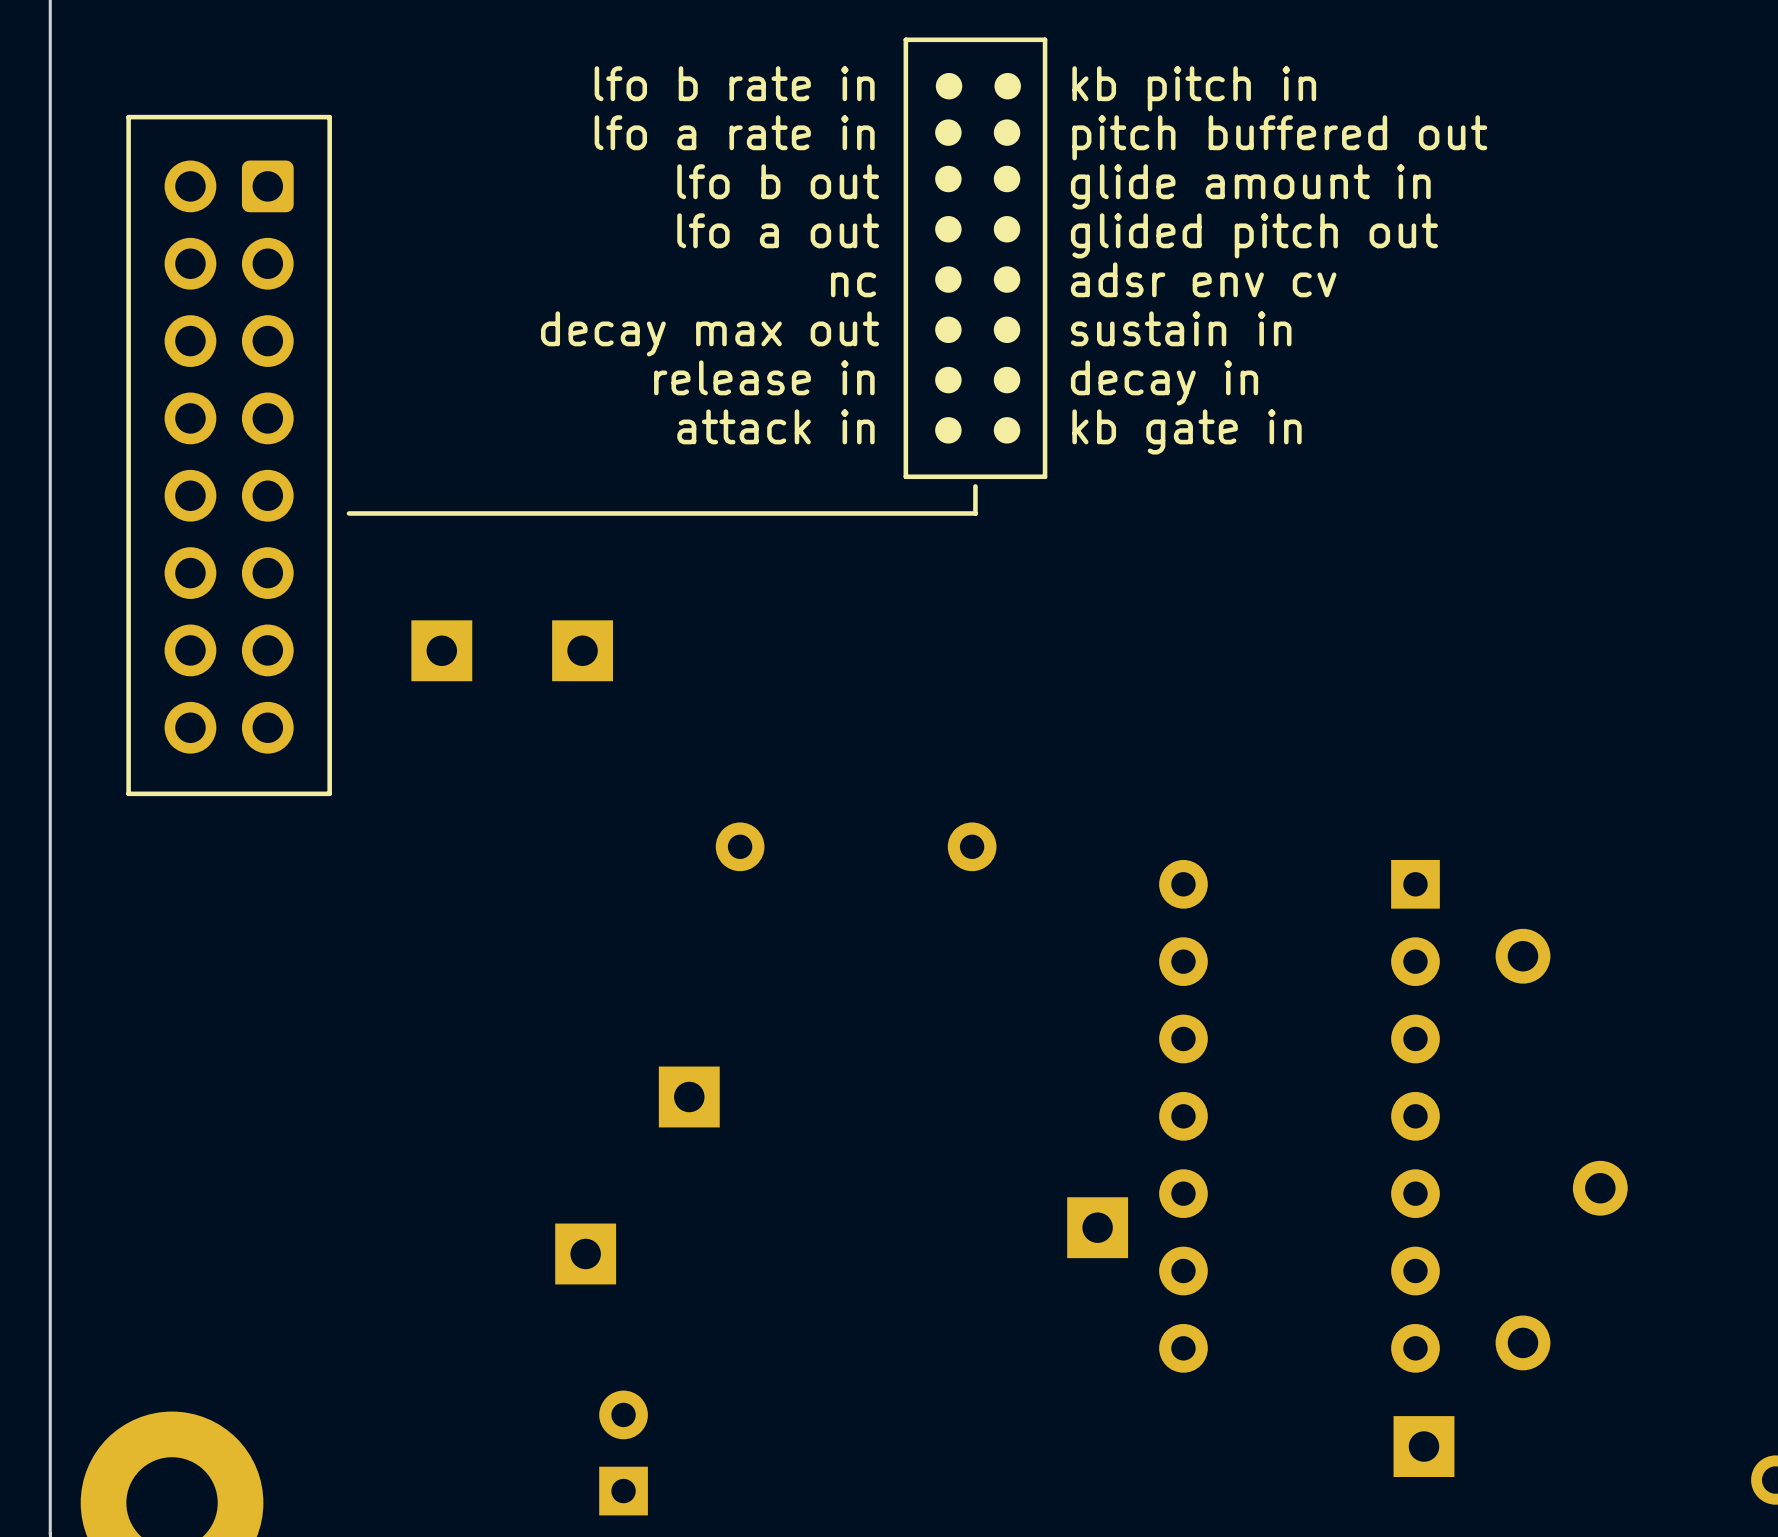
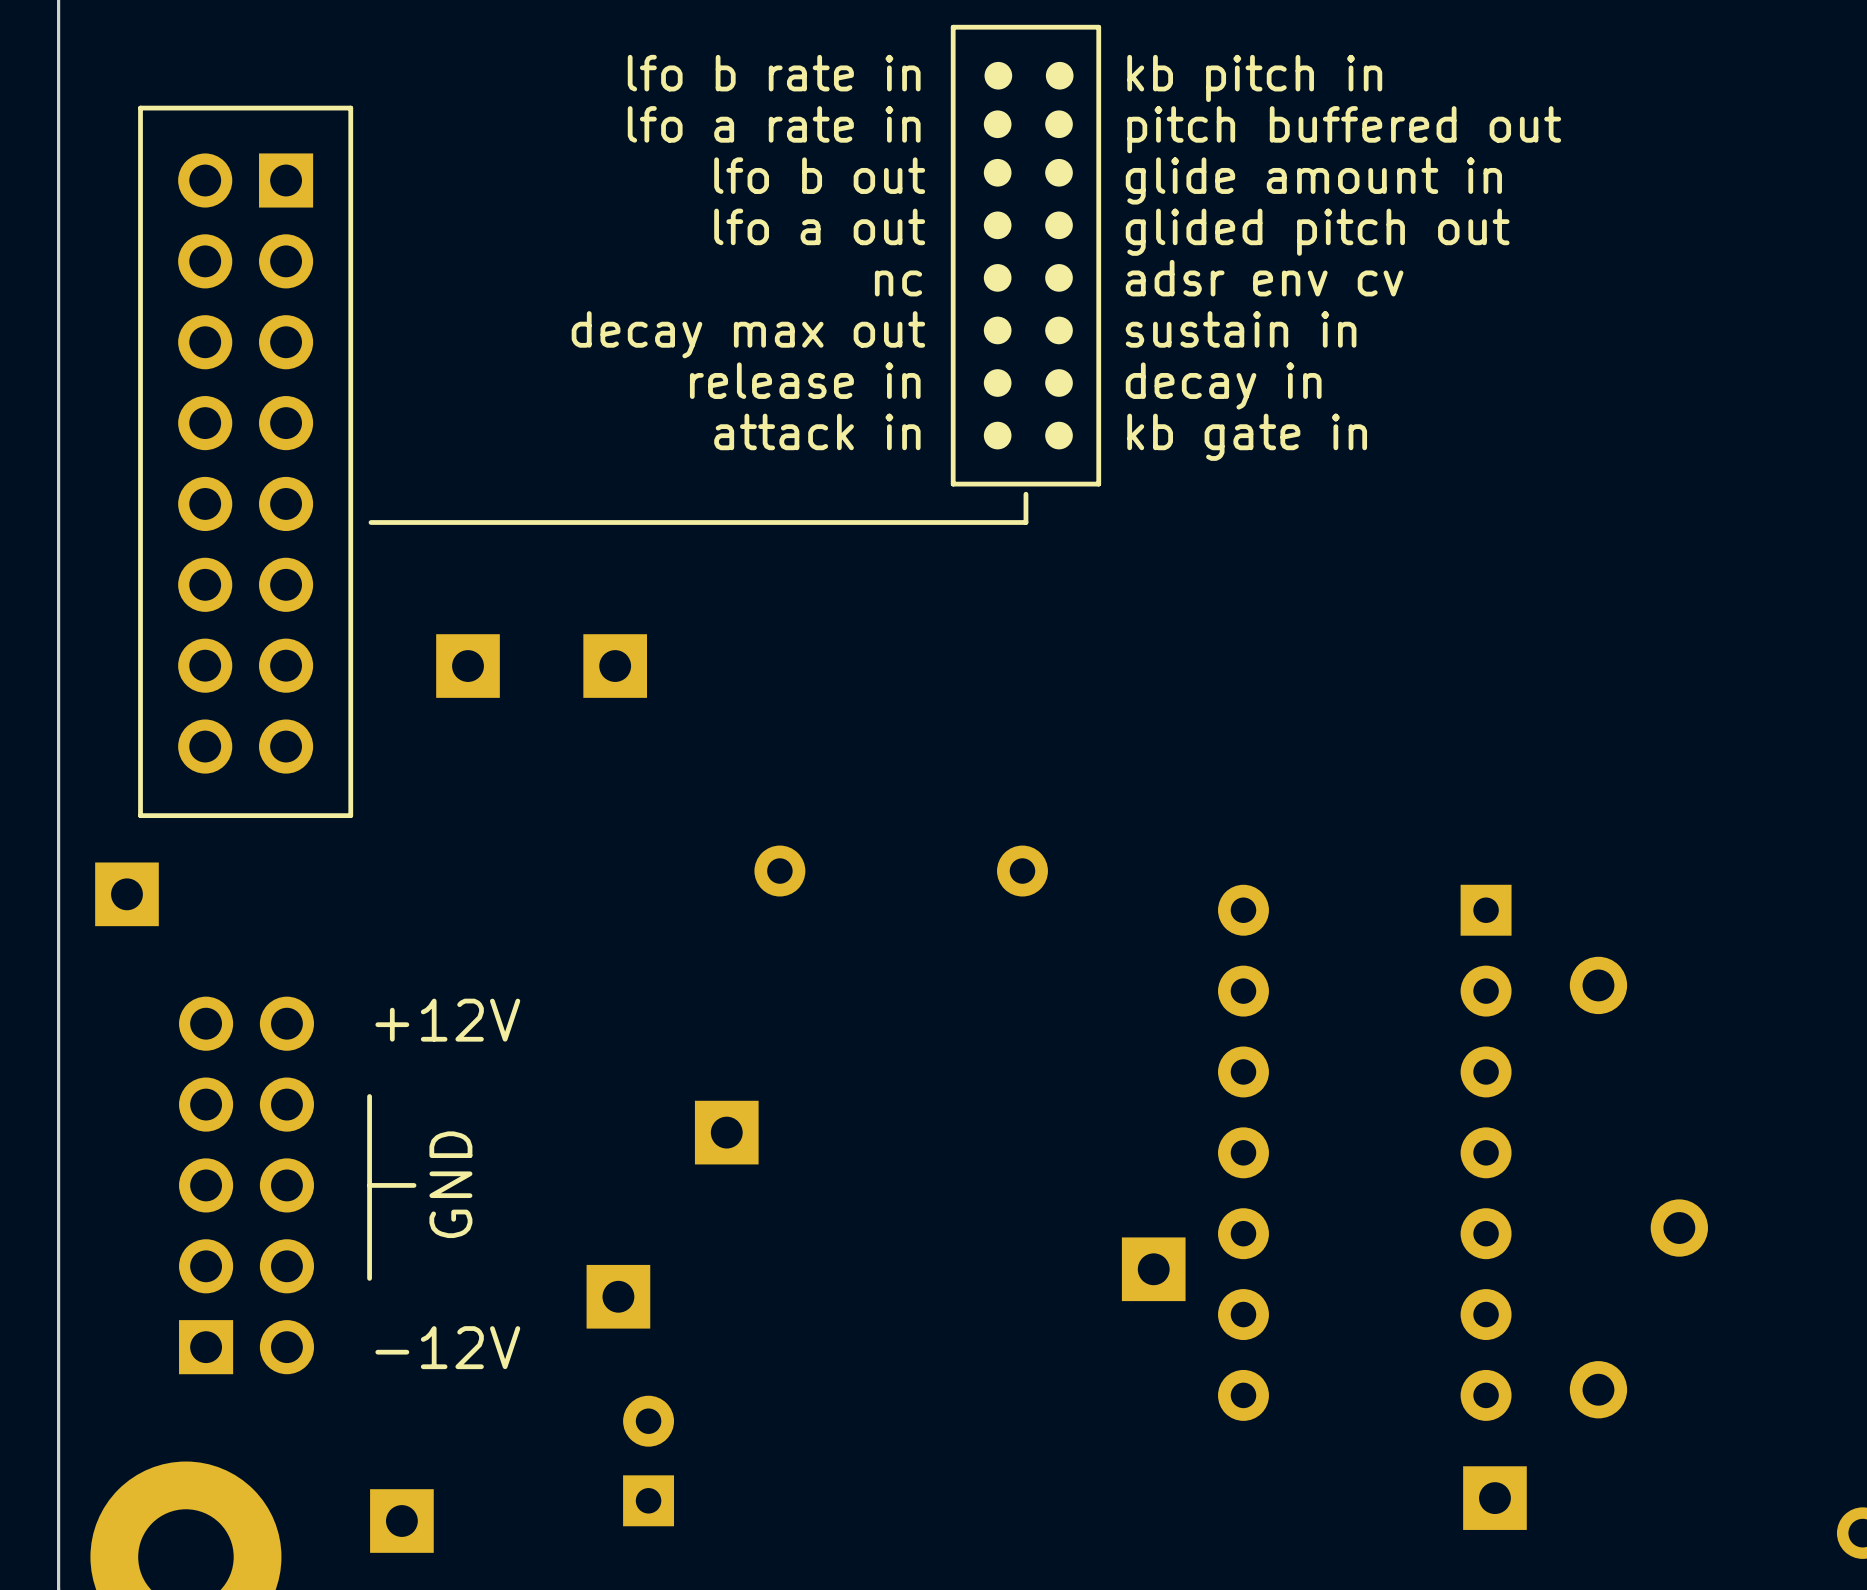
part footprint: [164, 160, 294, 754] -> [178, 153, 314, 774]
part: none -> (126, 894)
text: none -> +12V (447, 1020)
line: none -> (369, 1096) (369, 1278)
text: none -> GND (450, 1184)
part: none -> (246, 1185)
line: none -> (414, 1185) (369, 1185)
text: none -> -12V (447, 1347)
part position: (623, 1453) -> (648, 1461)
part: none -> (401, 1521)

